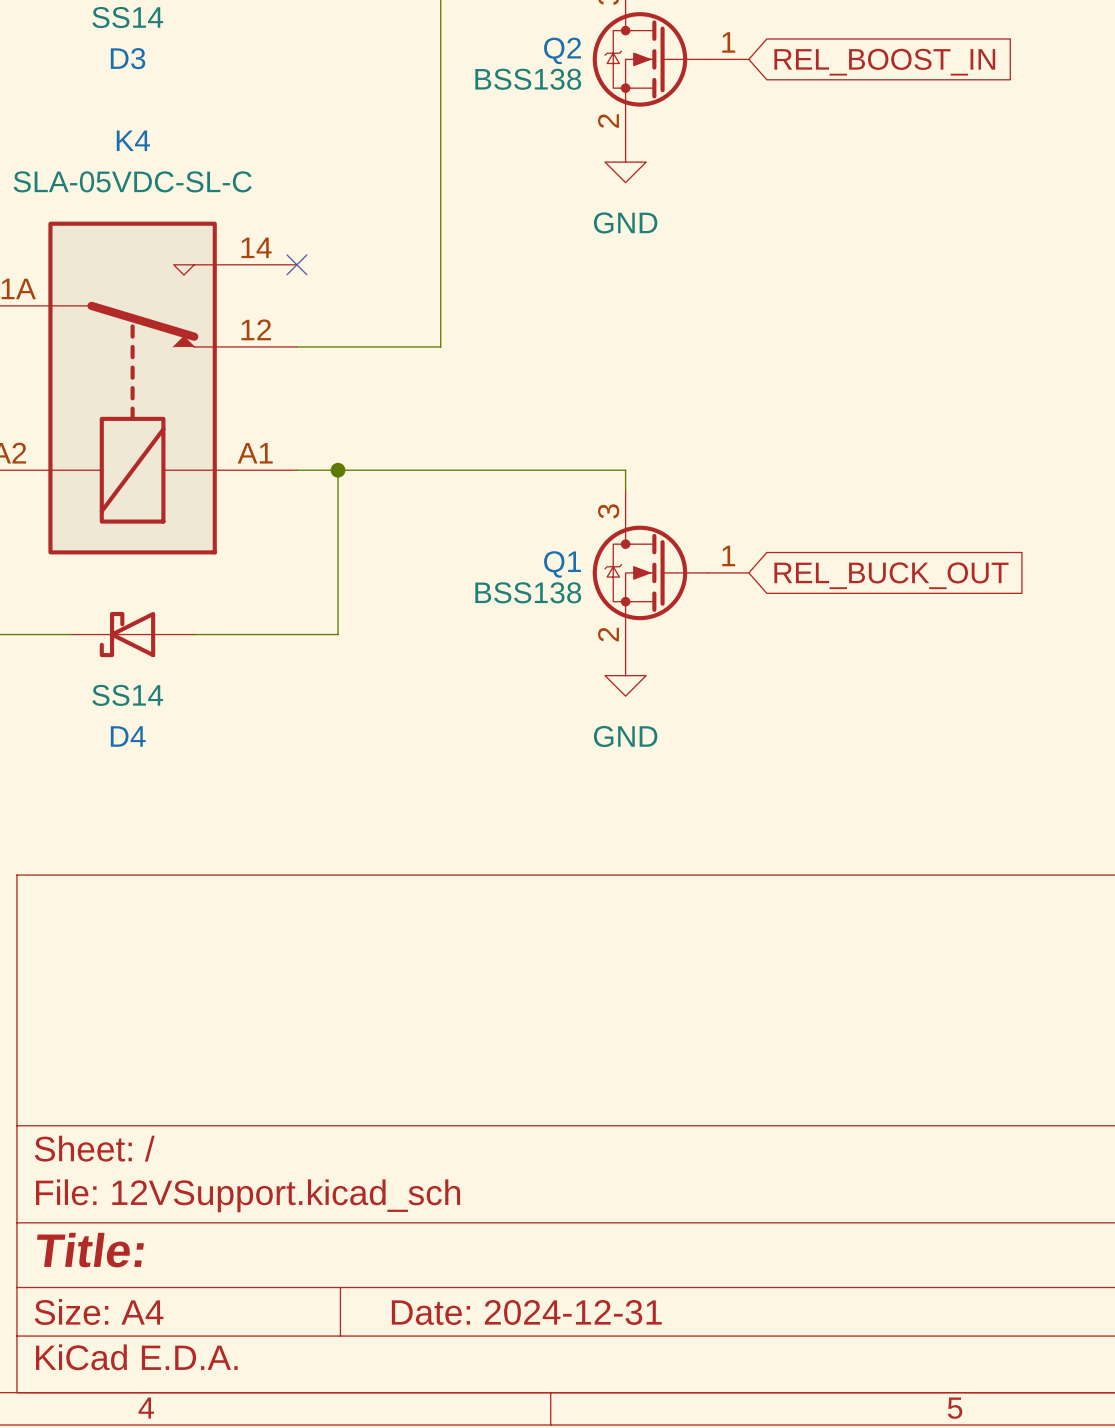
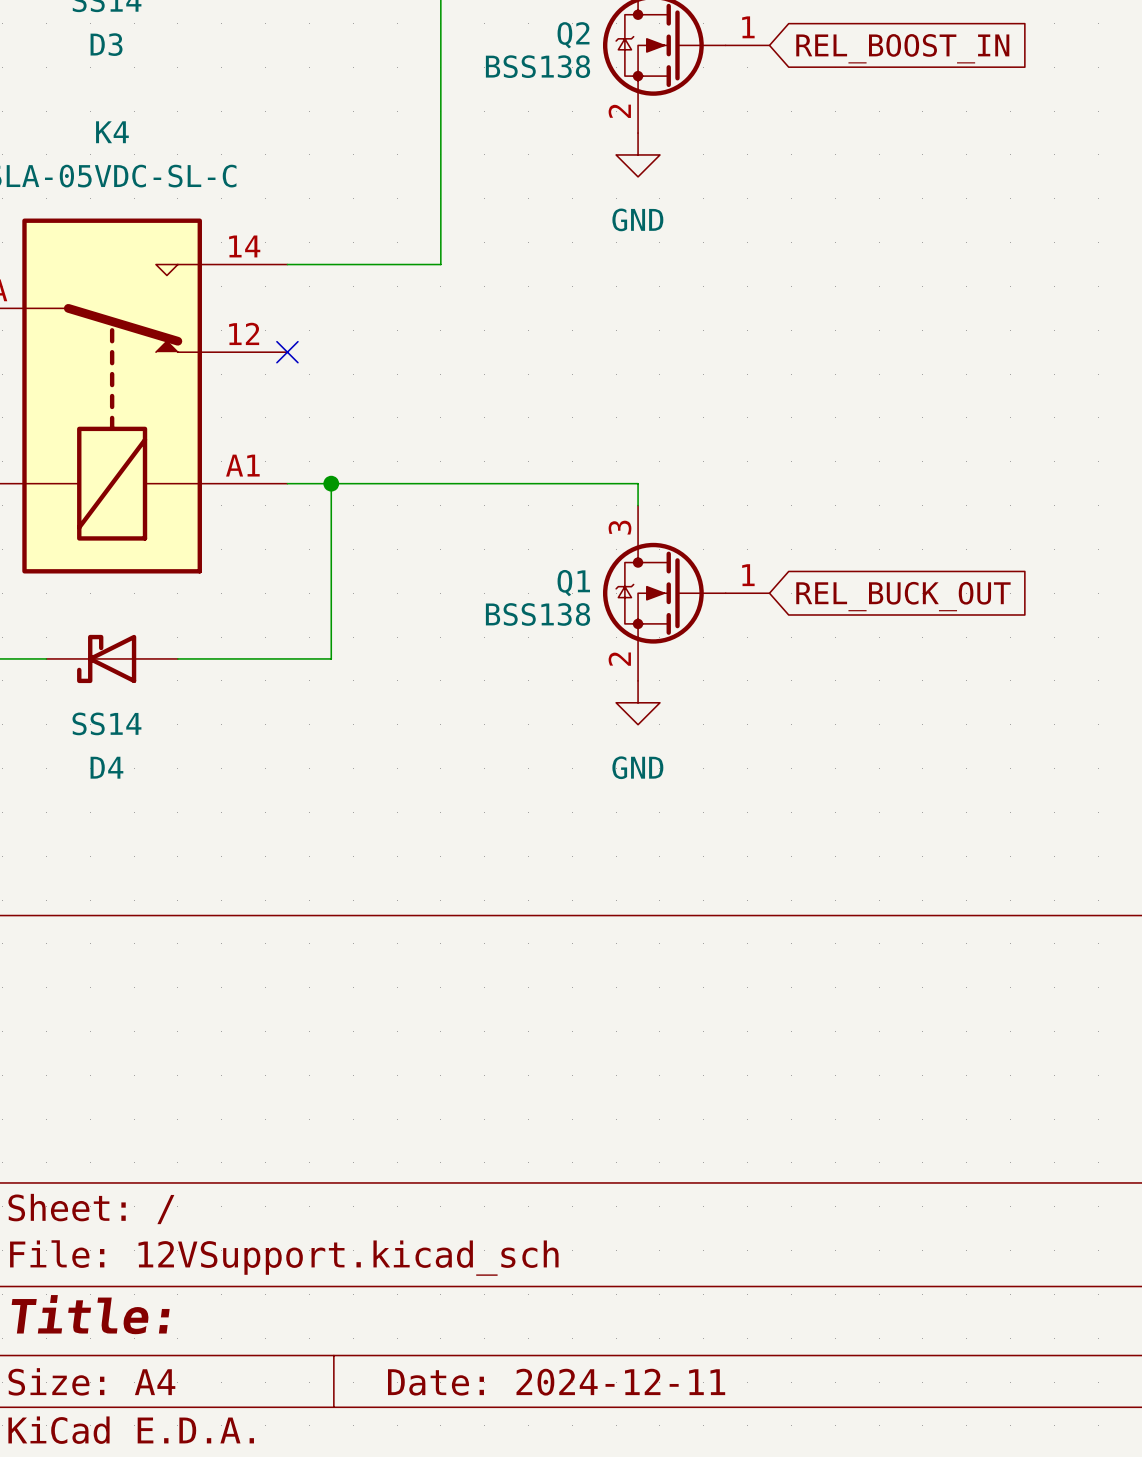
no-connect mark position: (296, 264) -> (287, 352)
wire: (440, 264) (440, 346) (296, 346) -> (440, 264) (287, 264)
title block: Date: 2024-12-31 (526, 1312) -> Date: 2024-12-11 (556, 1382)

